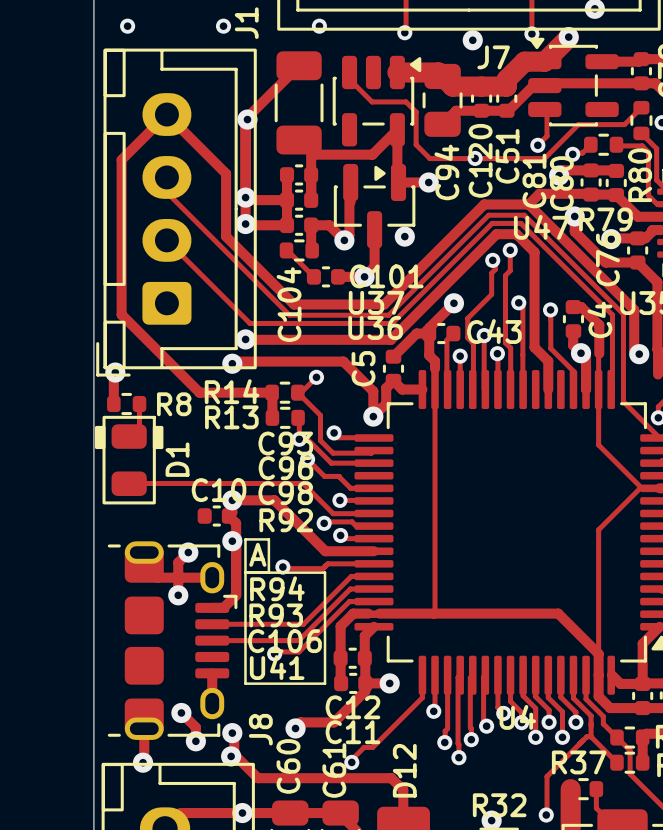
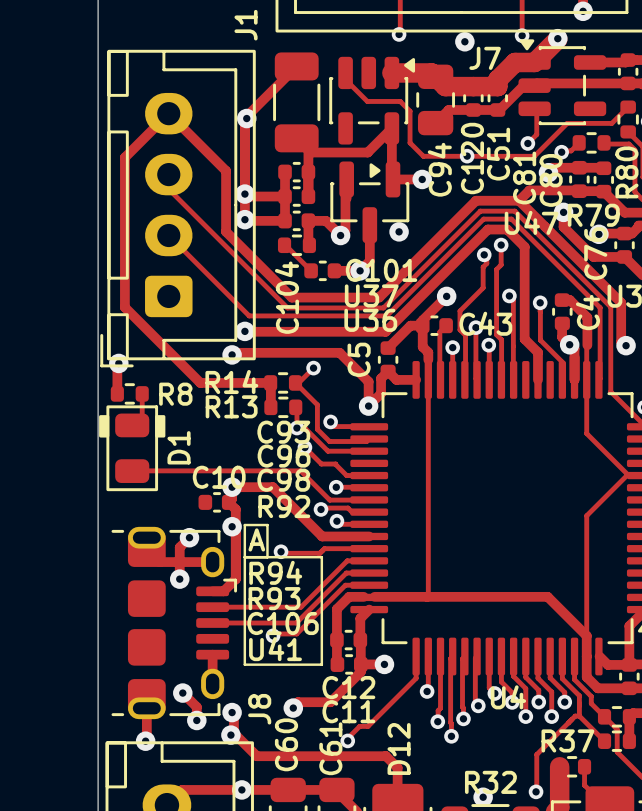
via: (127, 26) -> none
via: (223, 26) -> none
via: (319, 26) -> none

